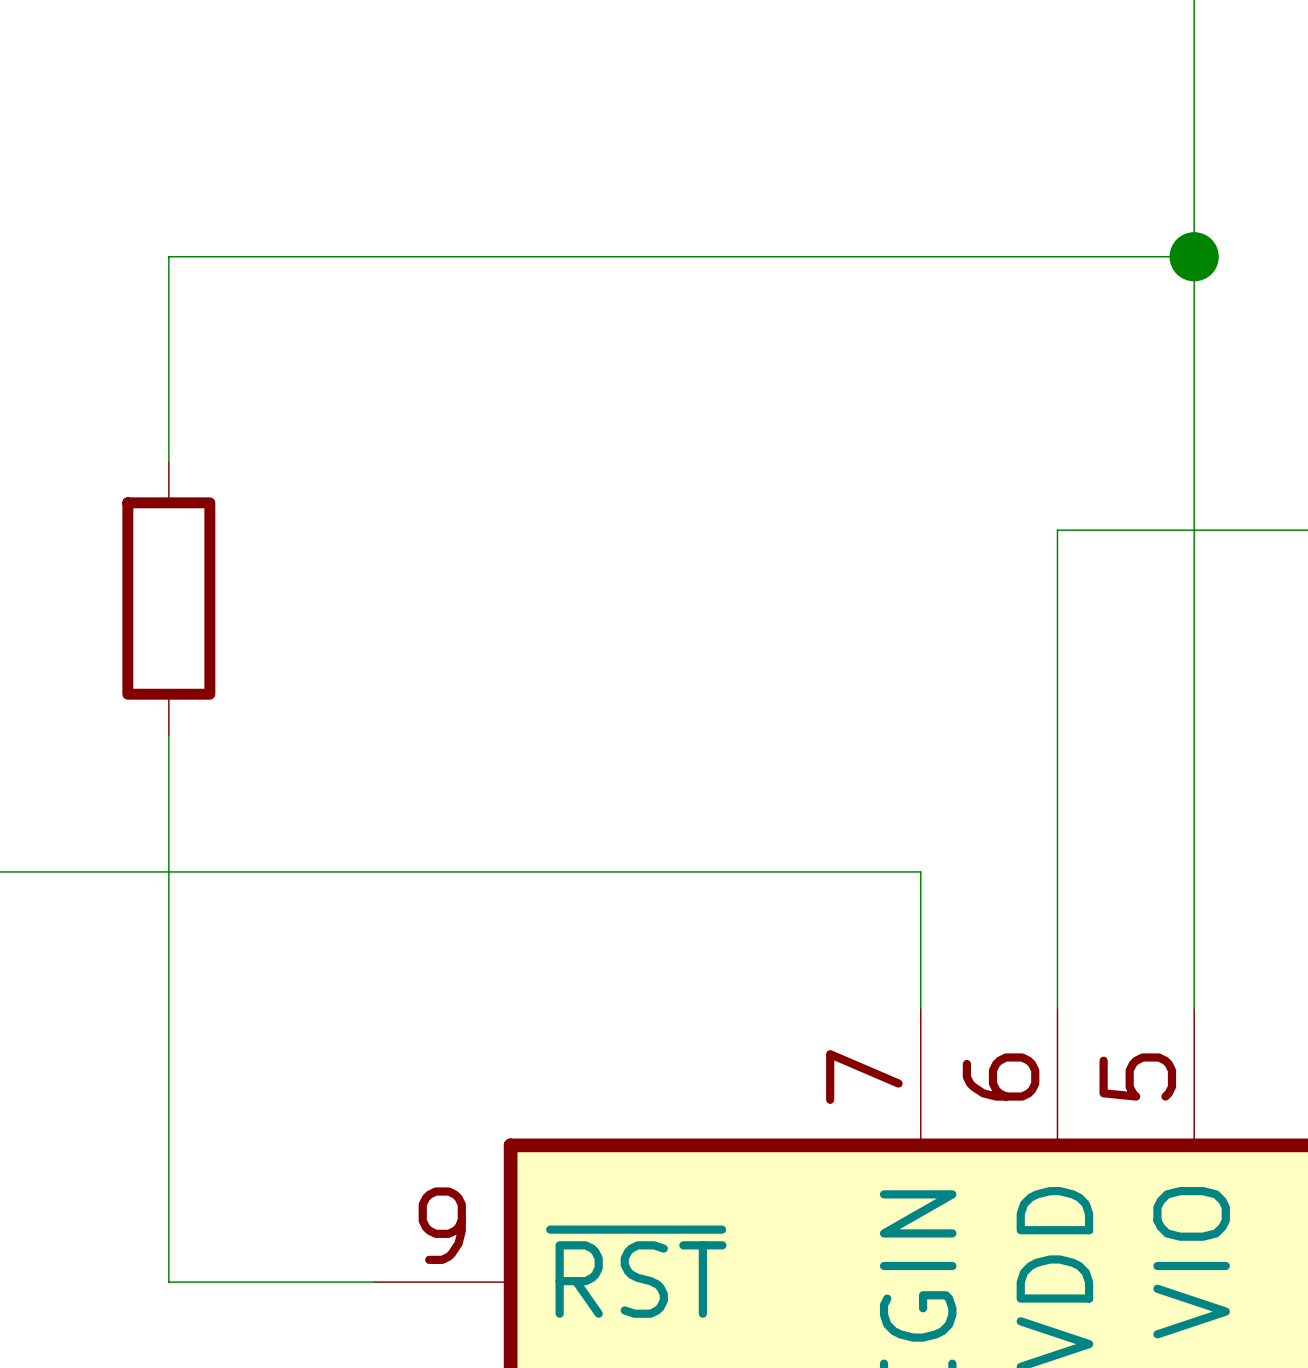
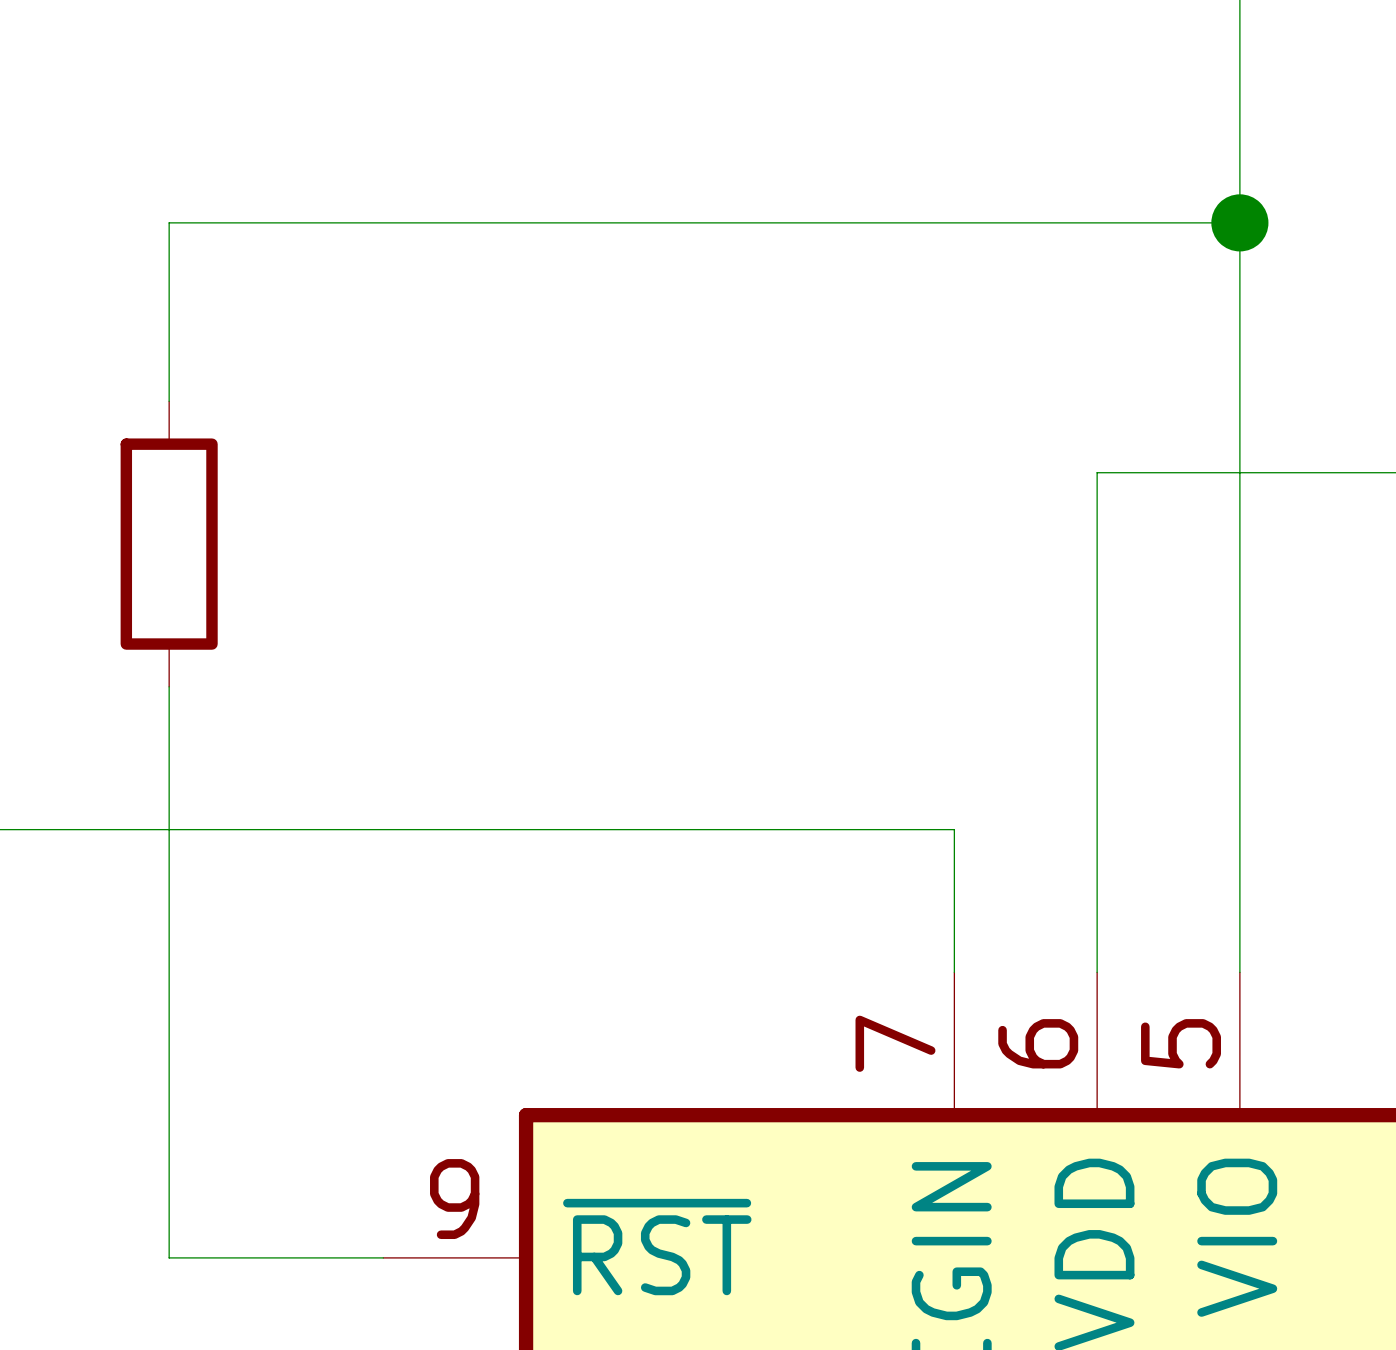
wire: (1194, 256) (168, 256) (168, 290) -> (1239, 222) (169, 222)
junction position: (1194, 256) -> (1239, 222)

